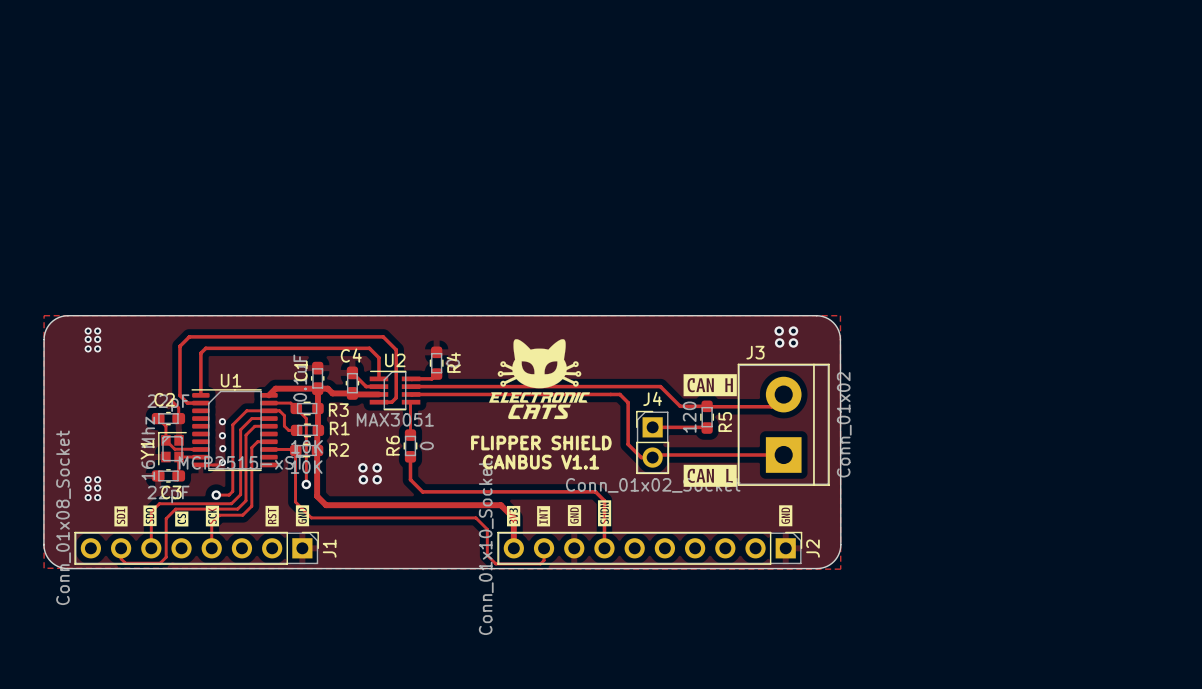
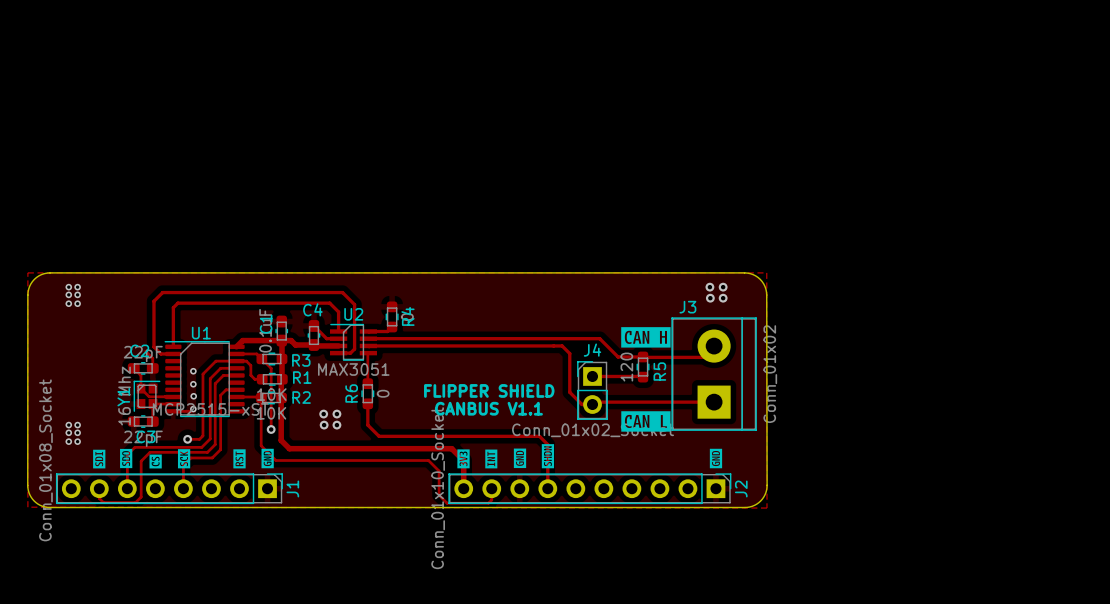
drawing: [489, 339, 590, 420] -> none

